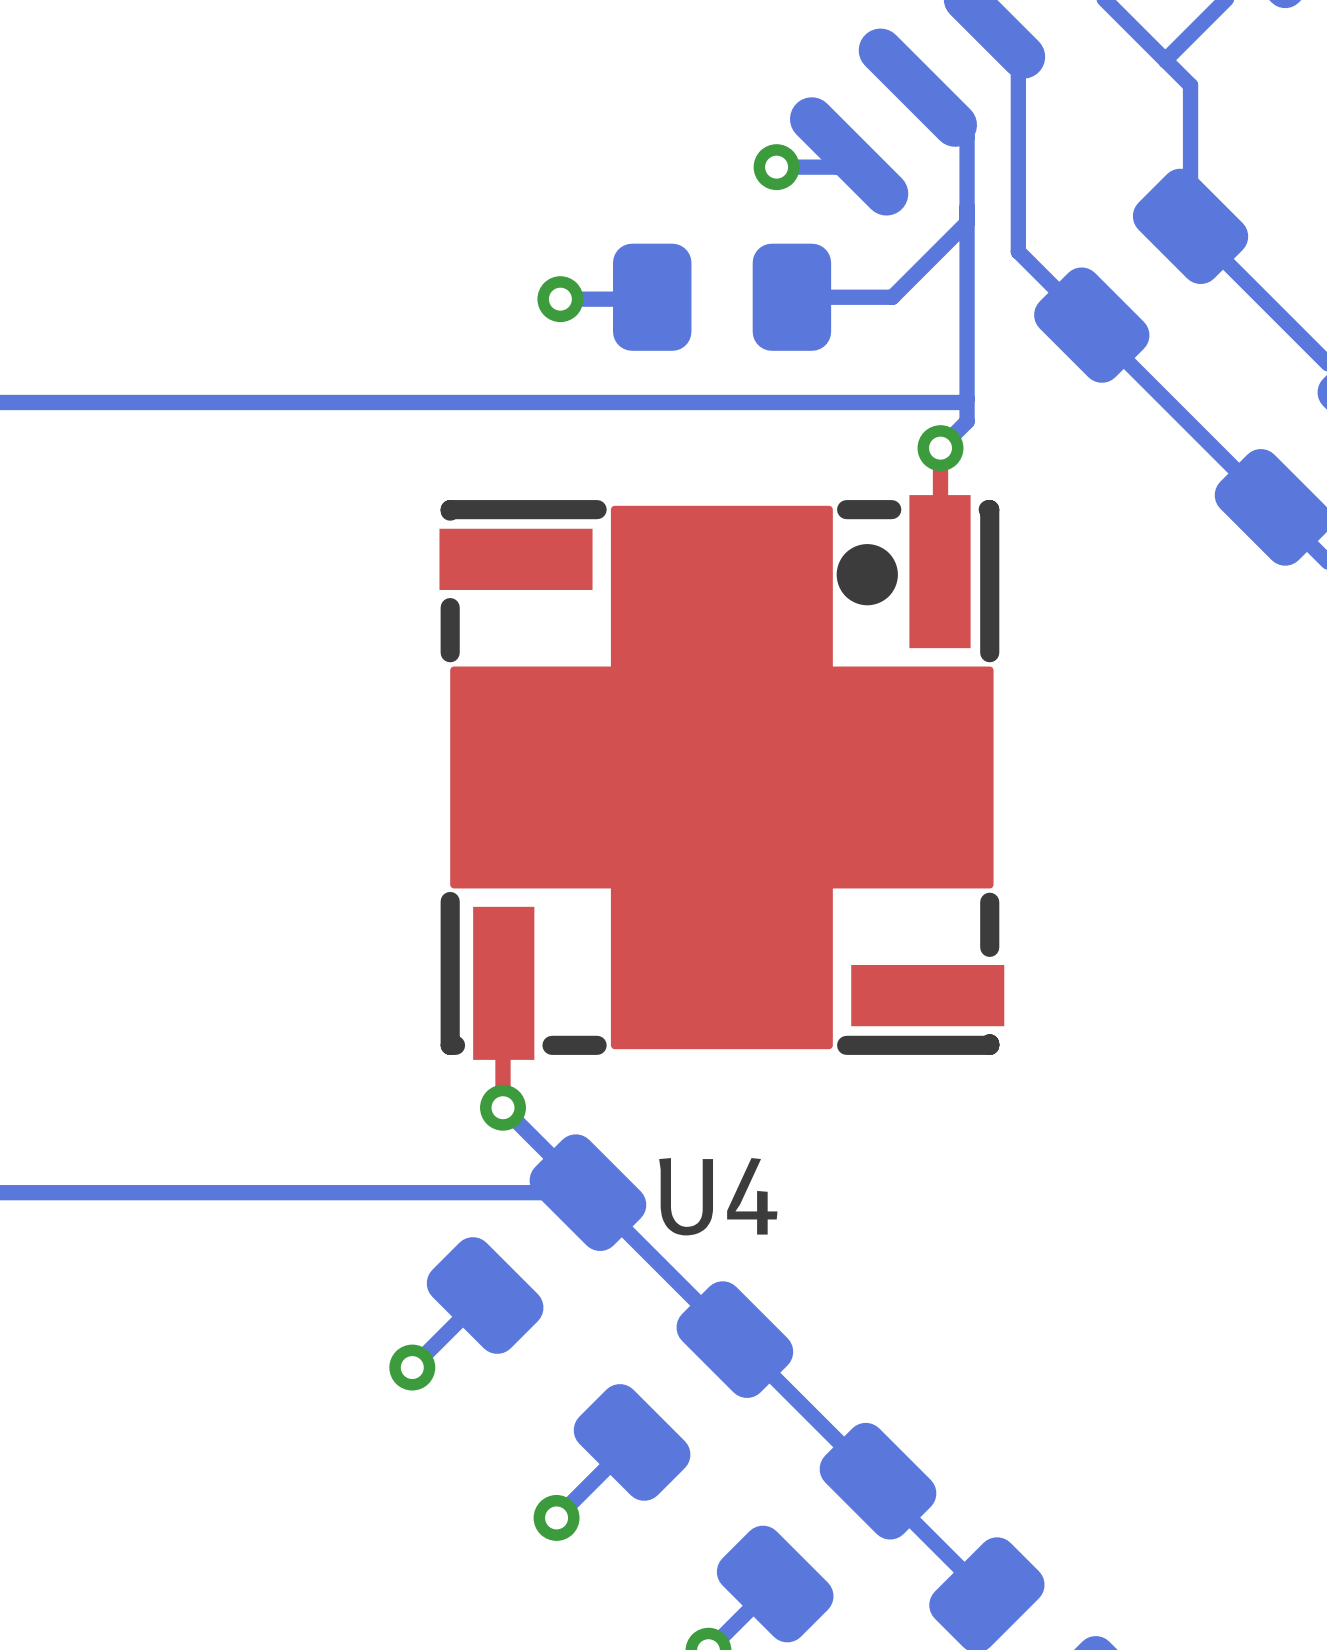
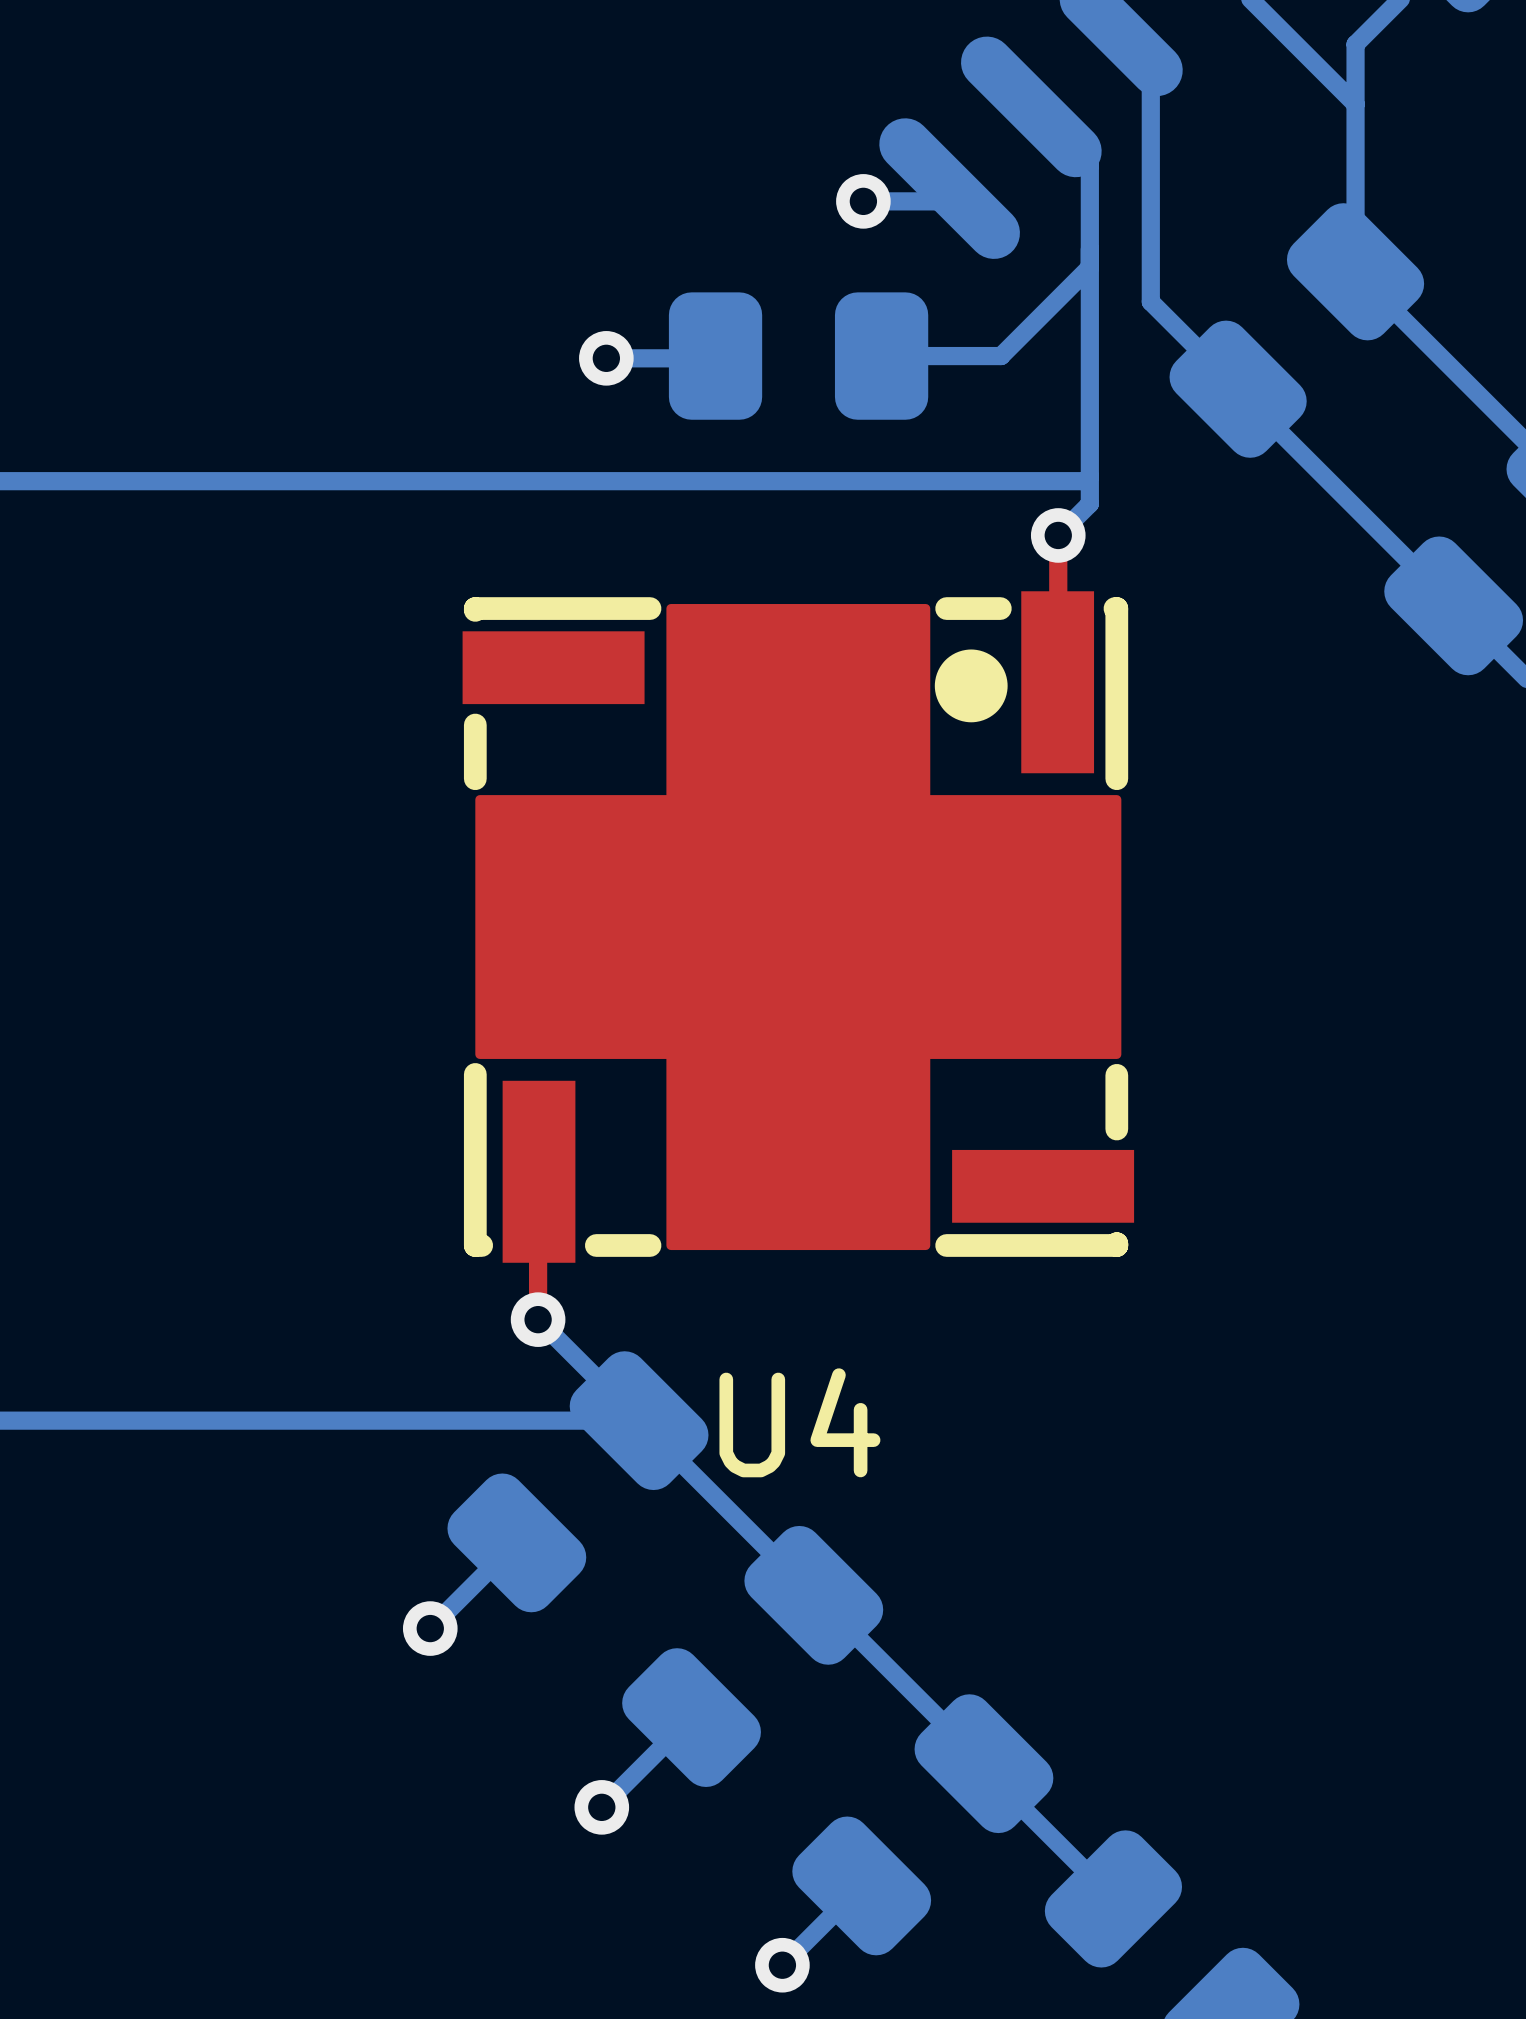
bottom track: (1190, 35) (1165, 59) -> (1355, 44) (1355, 104)

